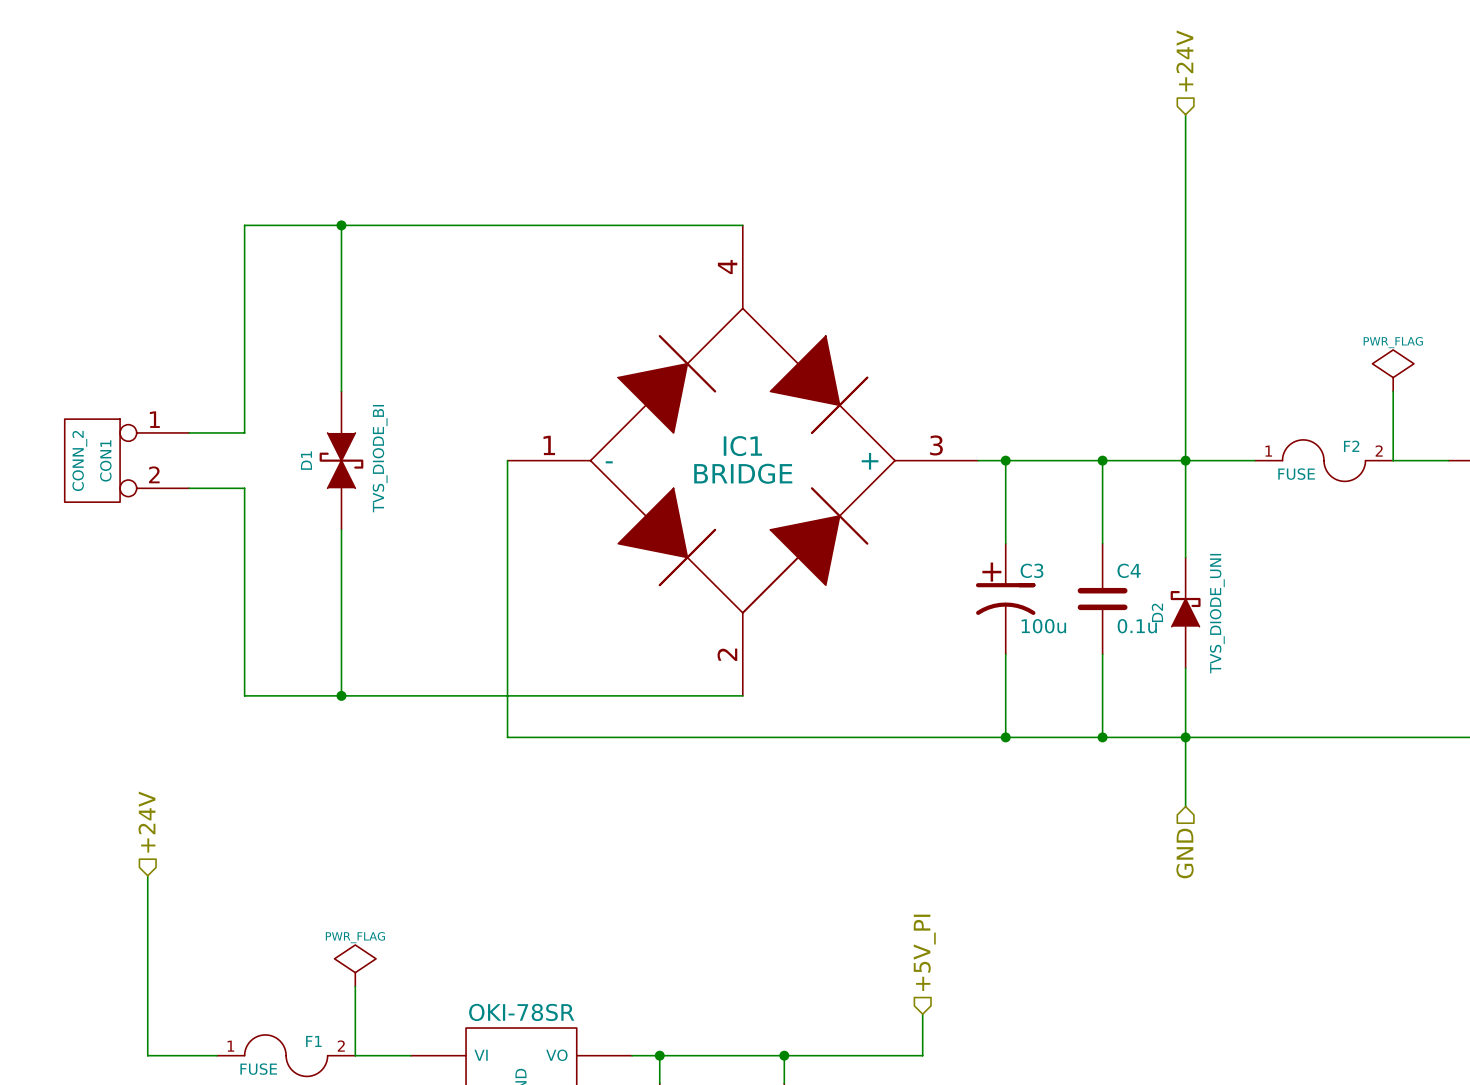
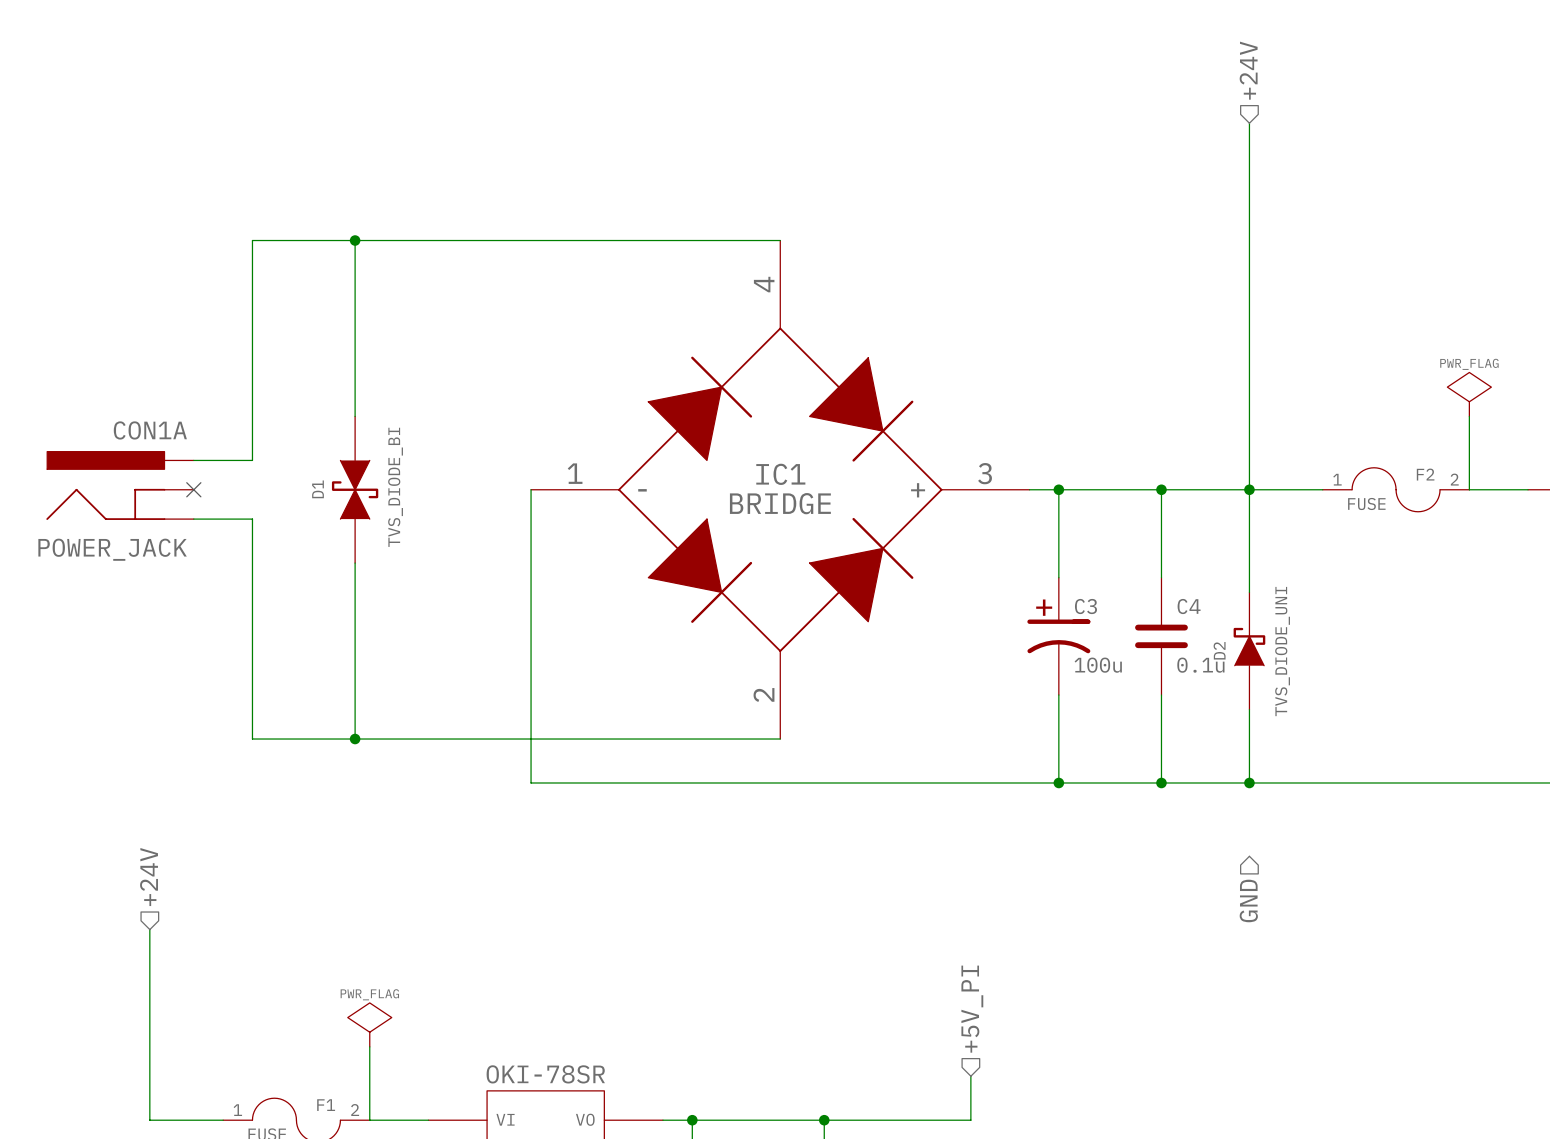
CON1A: none -> (120, 485)
CON1: CONN_2 (126, 460) -> none
no-connect mark: none -> (193, 489)
wire: (1185, 737) (1185, 806) -> none

